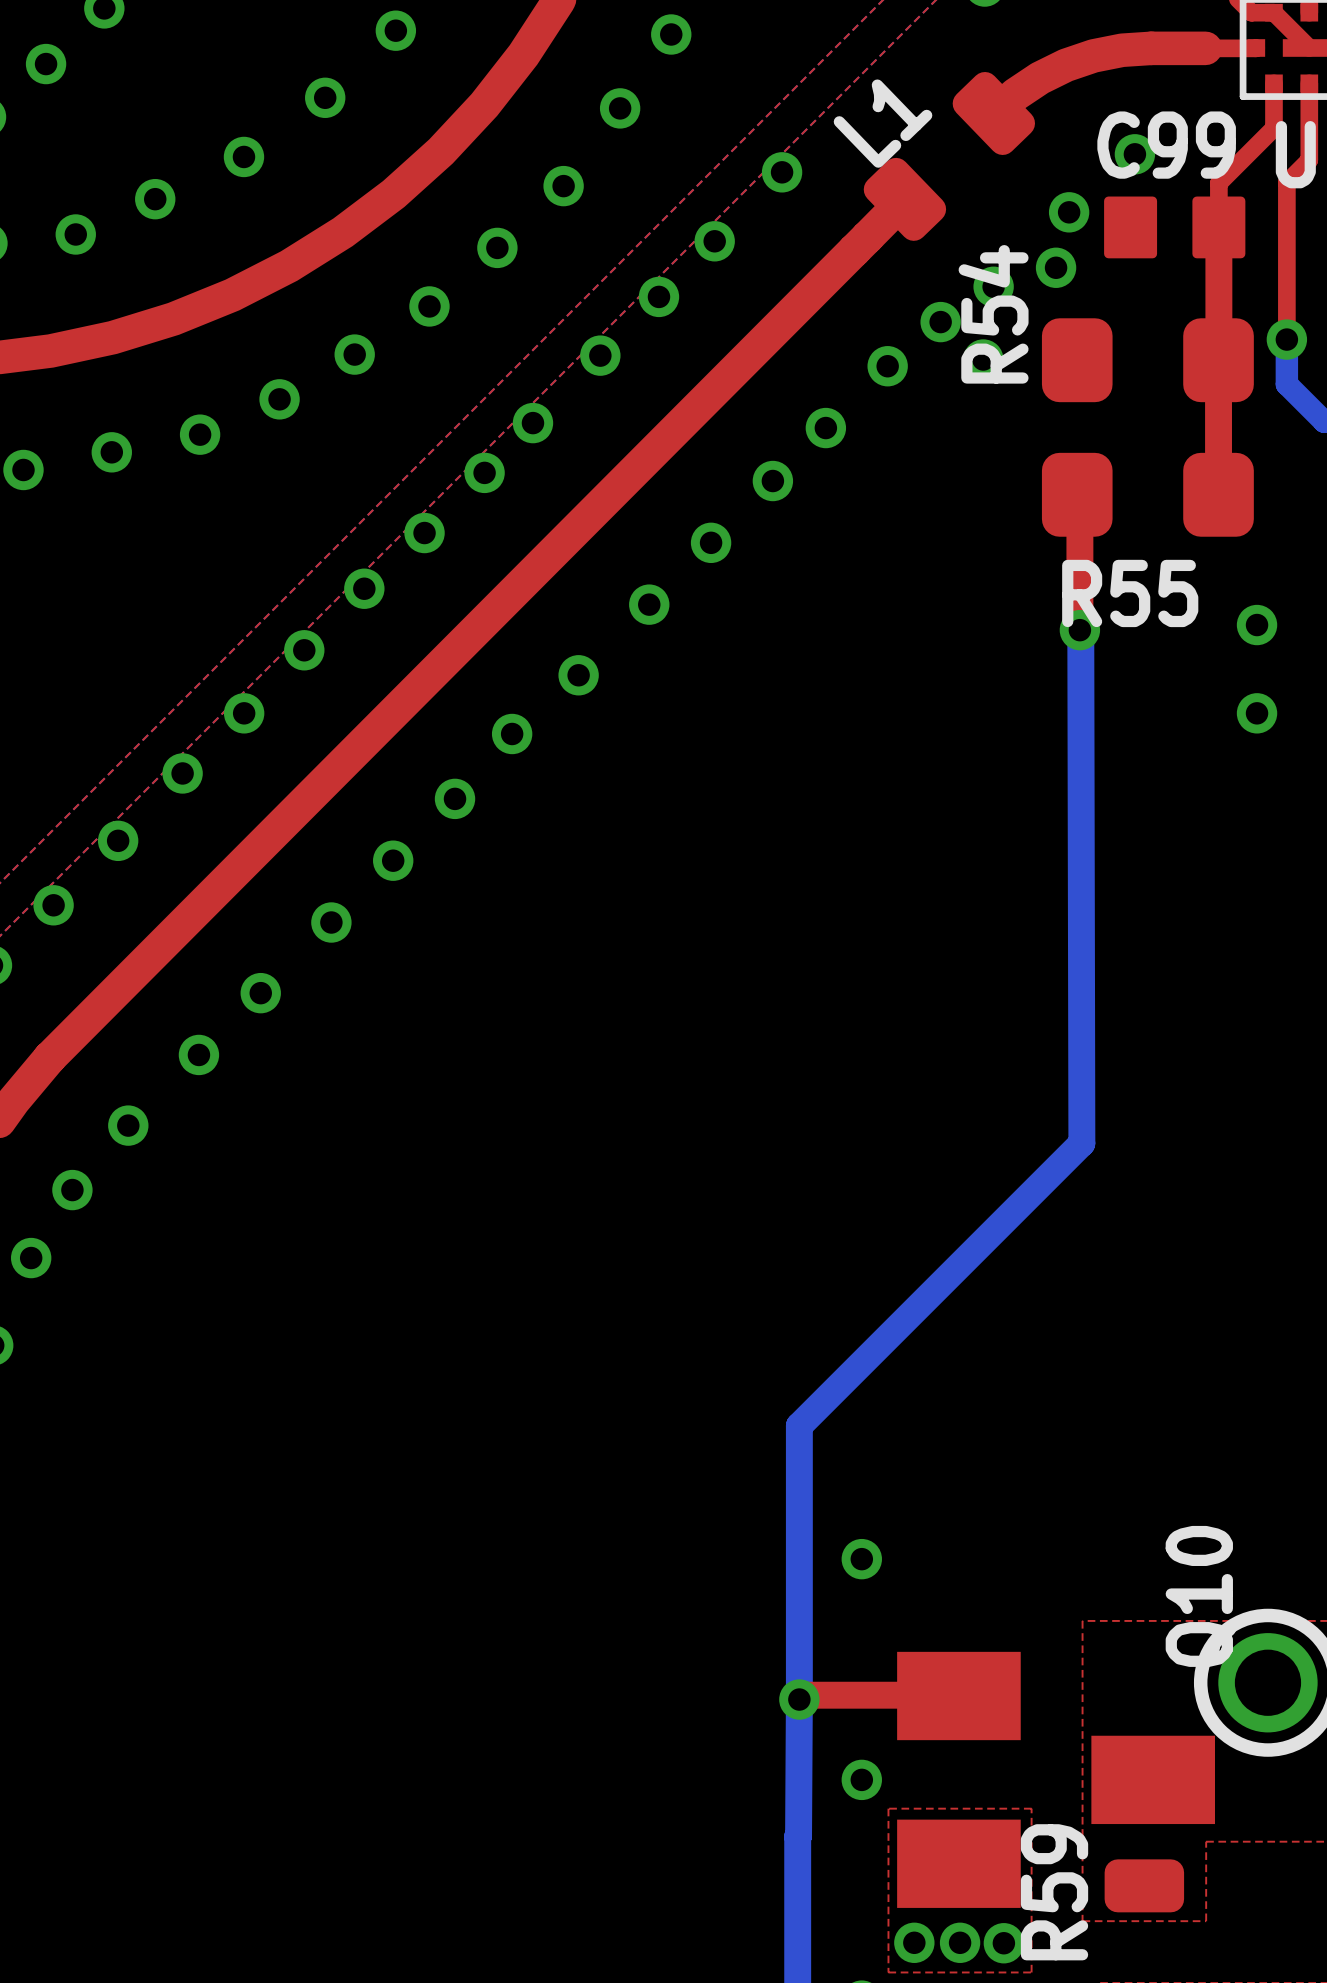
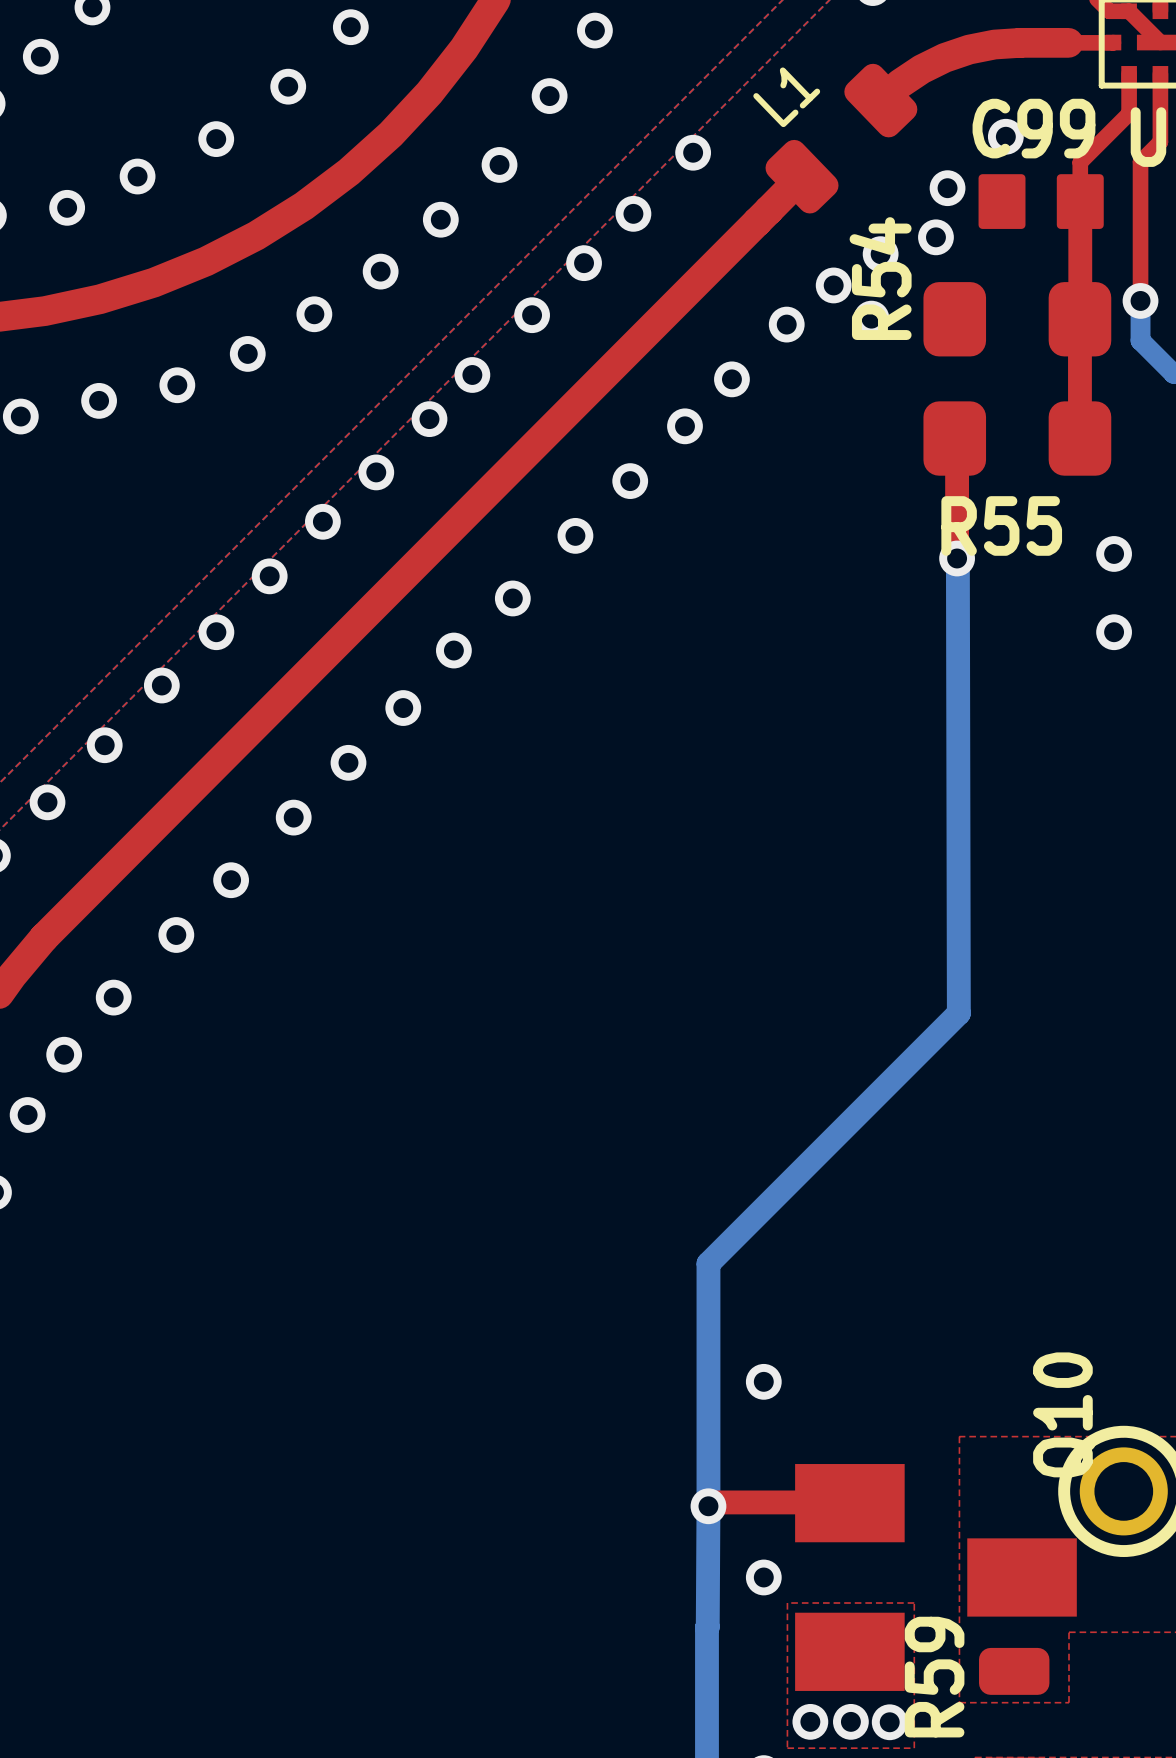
L1 name position: L1 (883, 123) -> L1 (786, 97)

